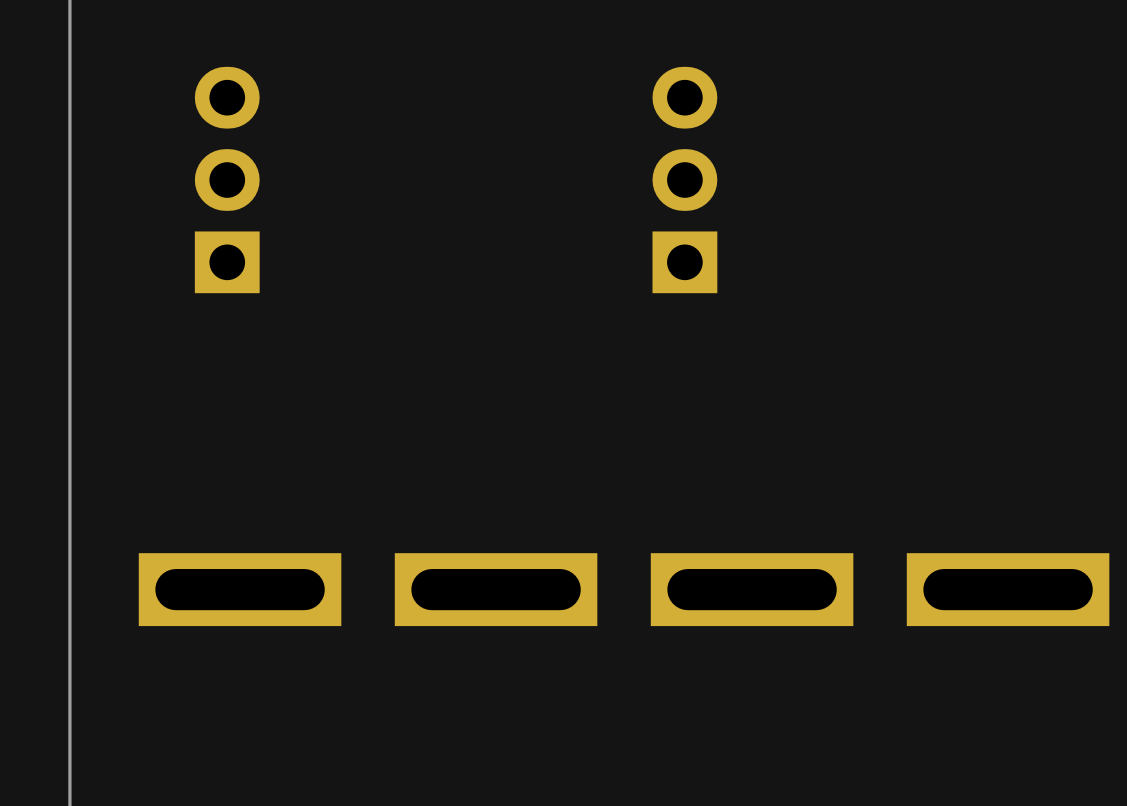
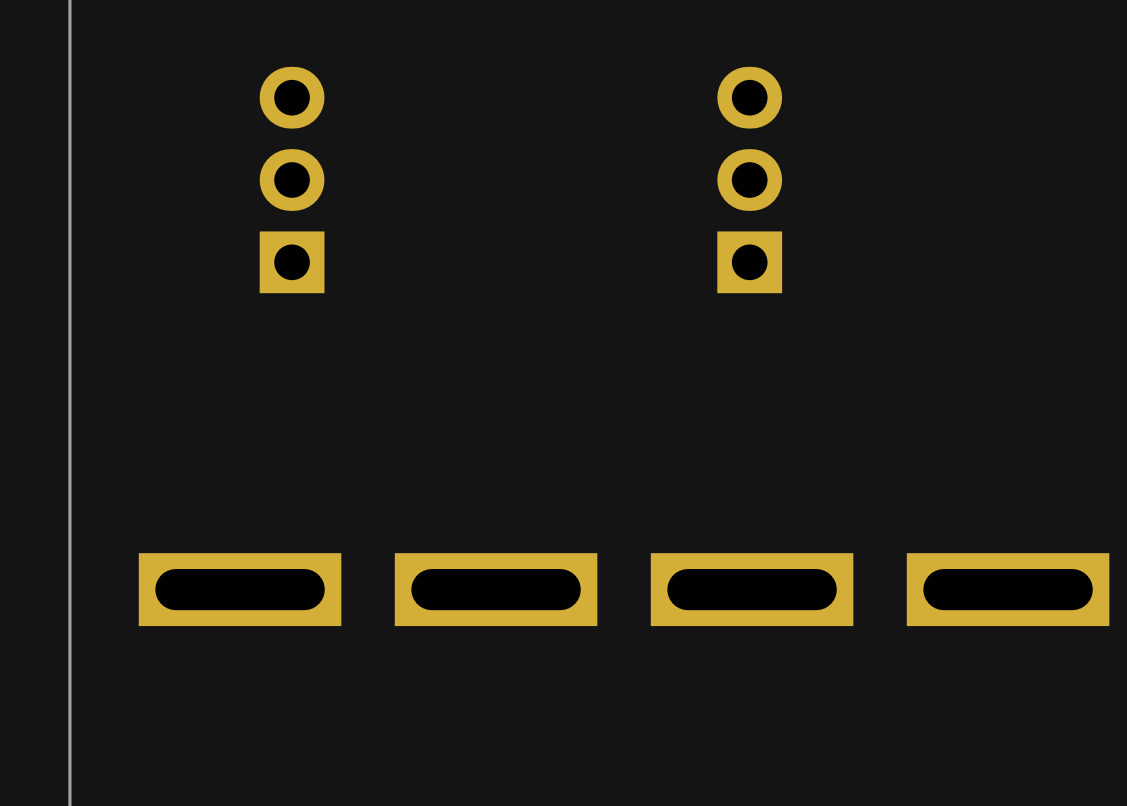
part position: (227, 180) -> (292, 180)
part position: (684, 180) -> (749, 180)

